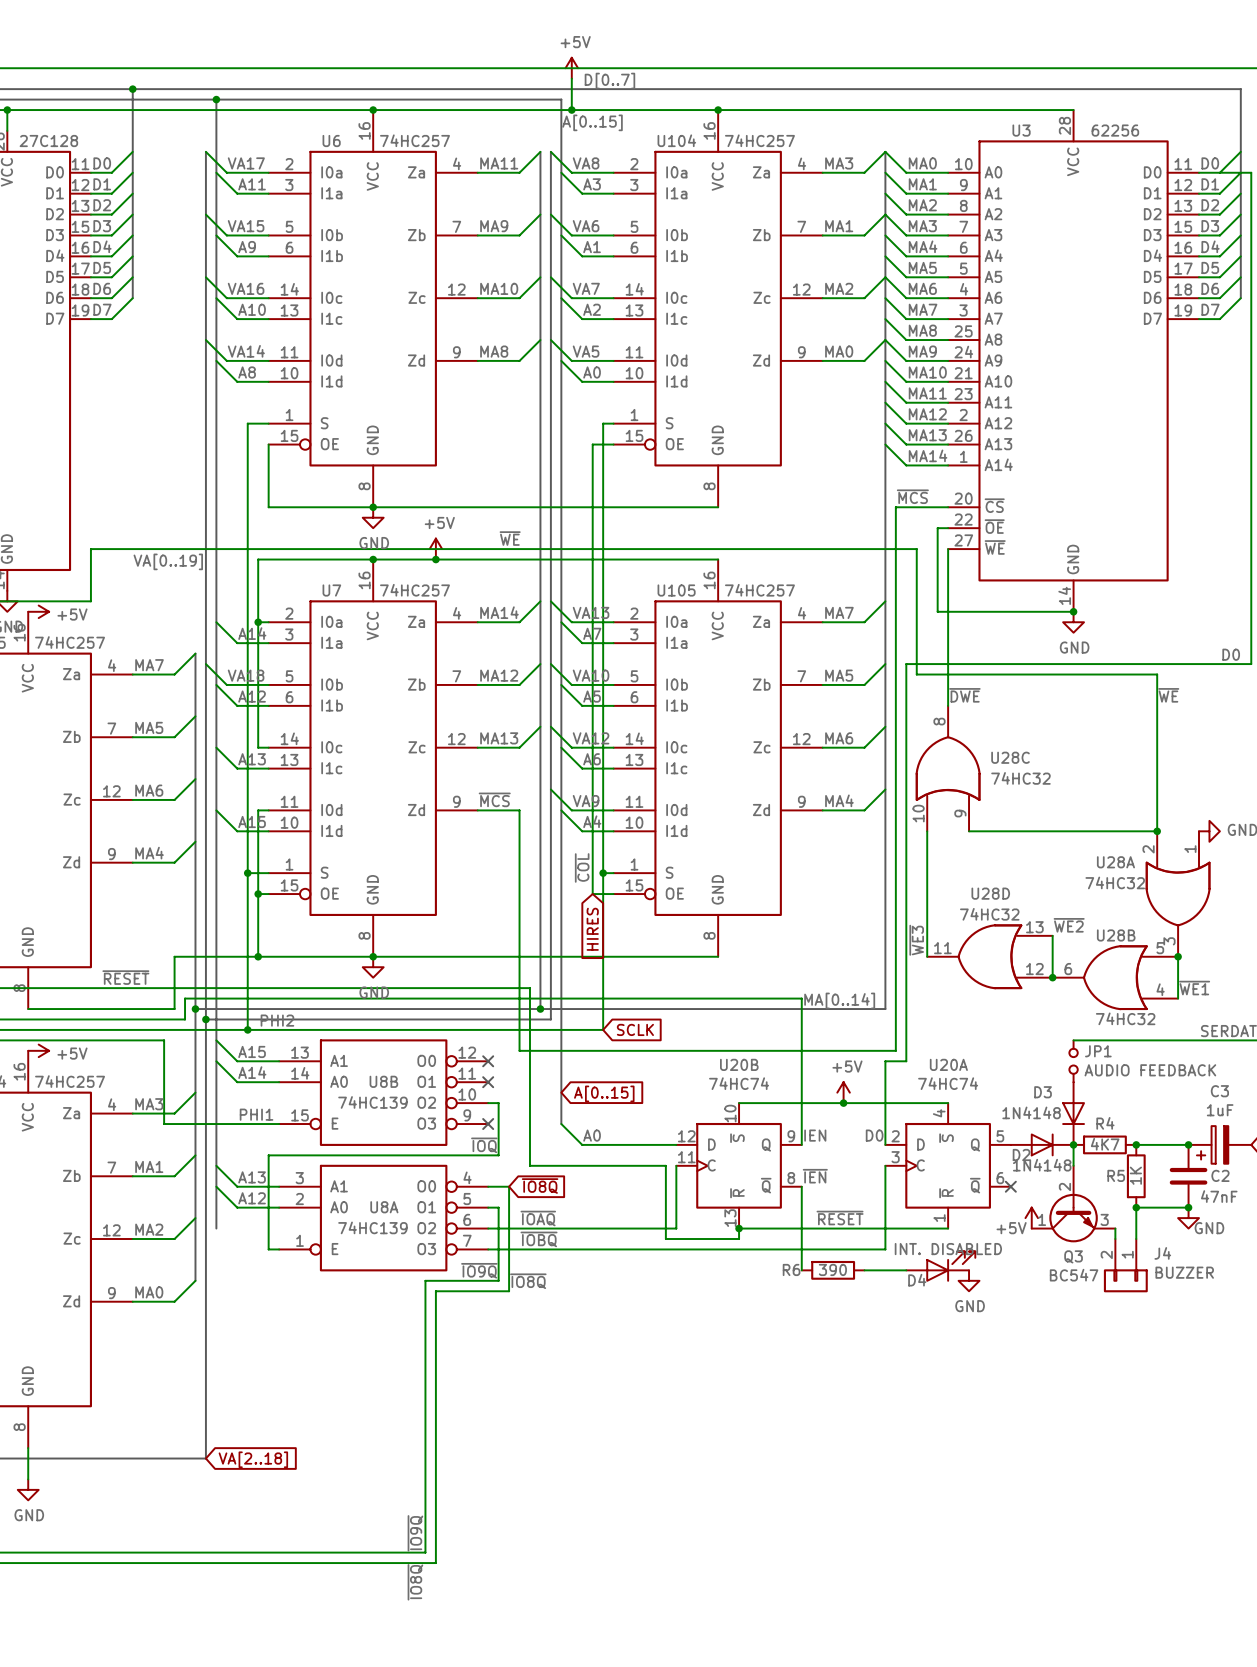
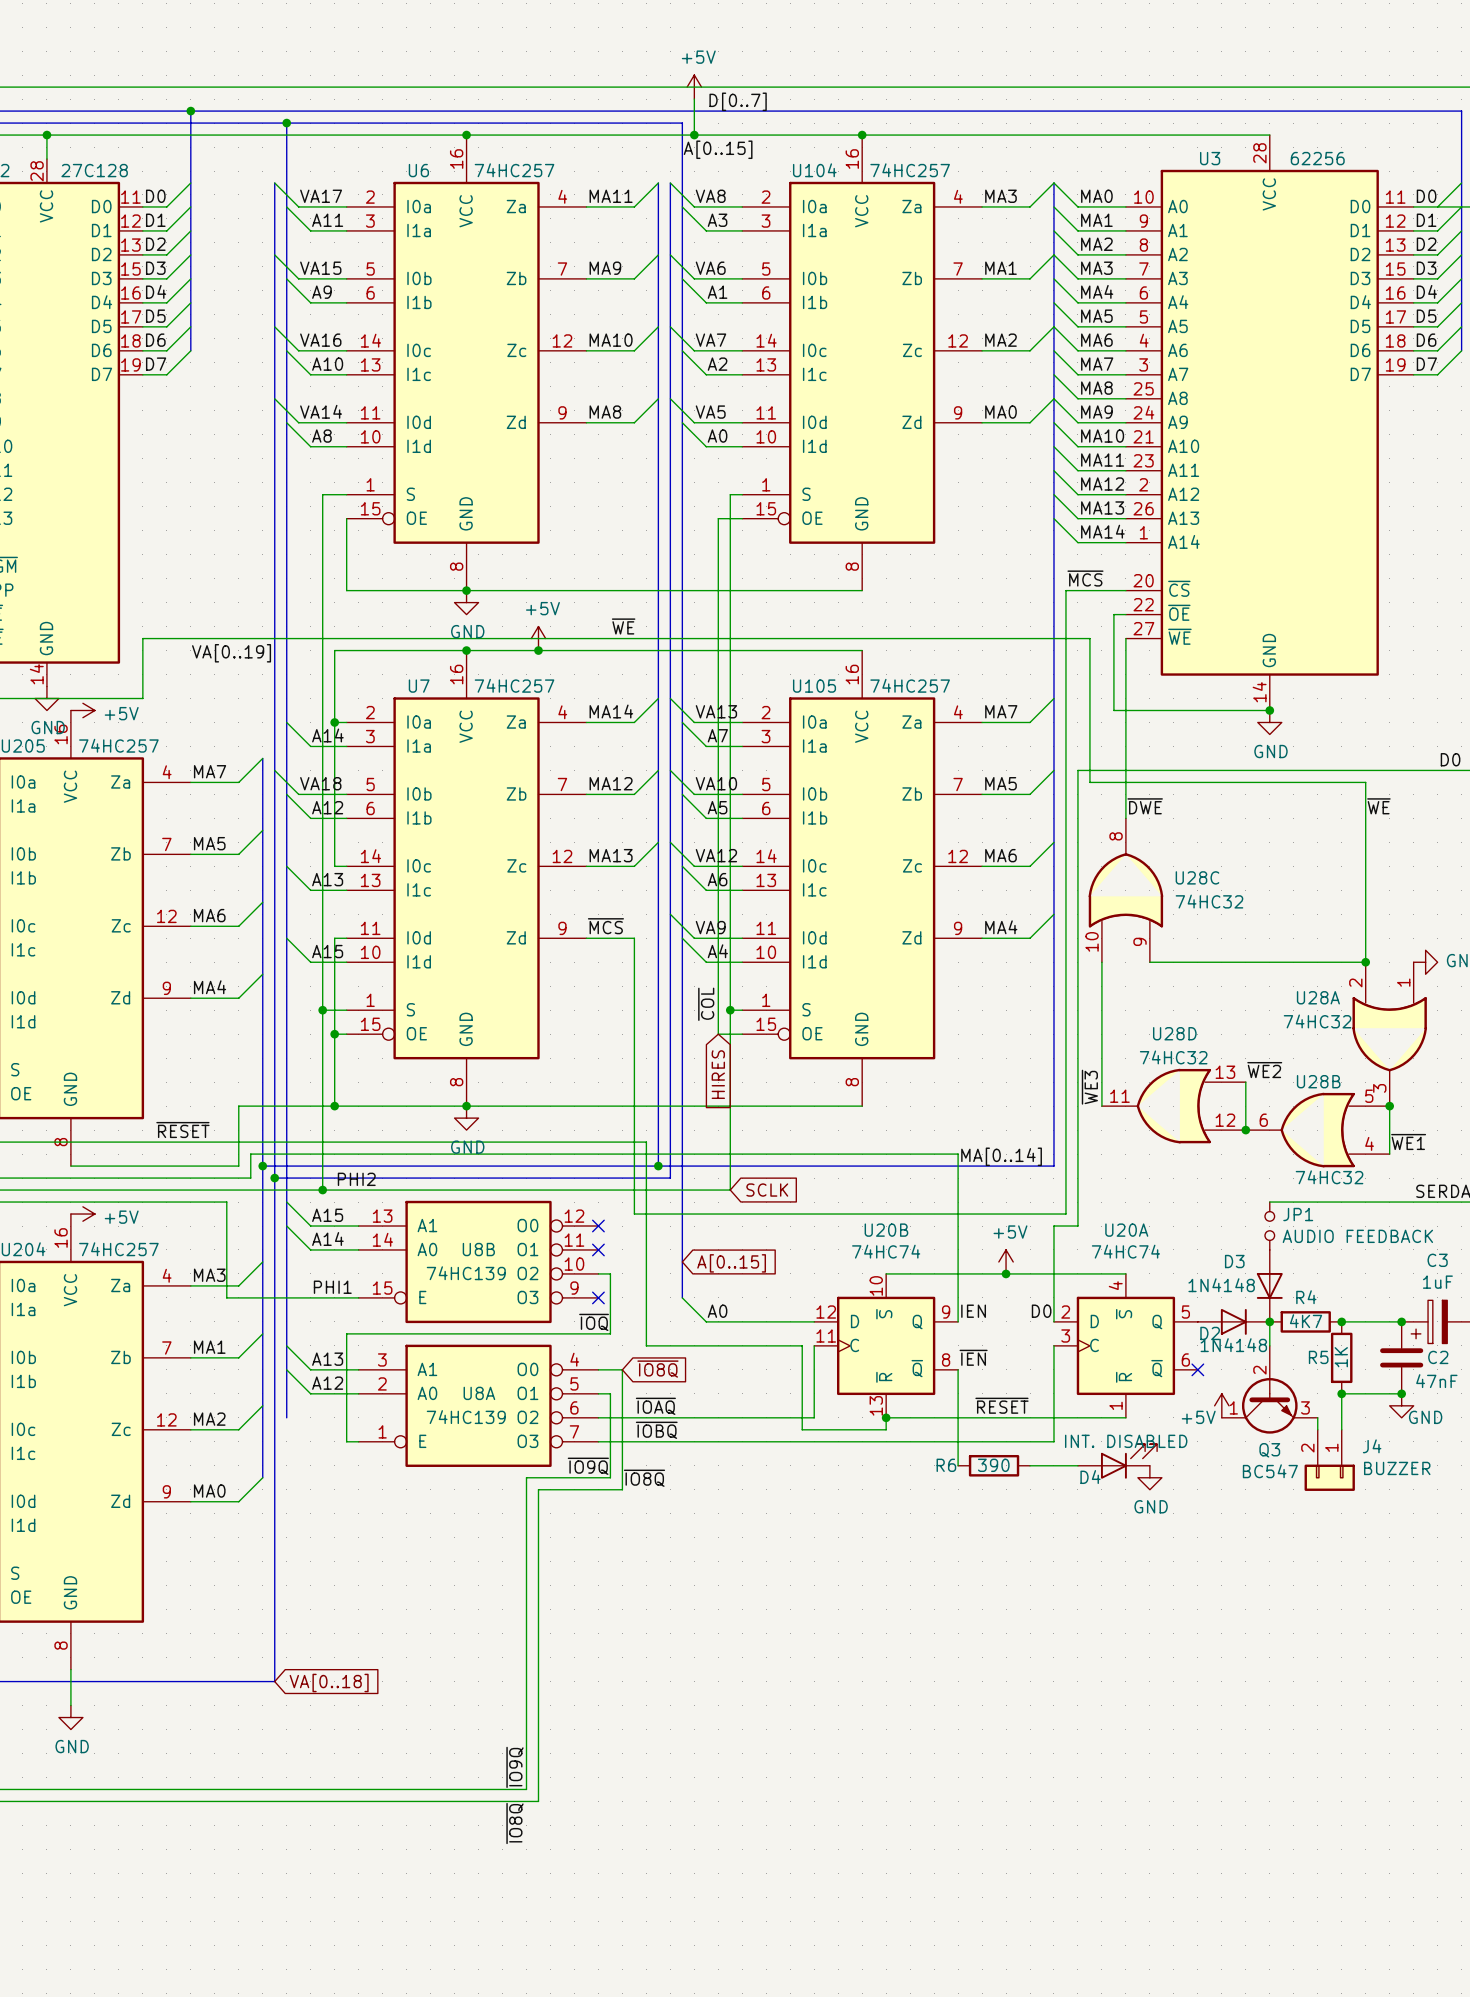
global label: VA[2..18] (253, 1459) -> VA[0..18] (329, 1682)

